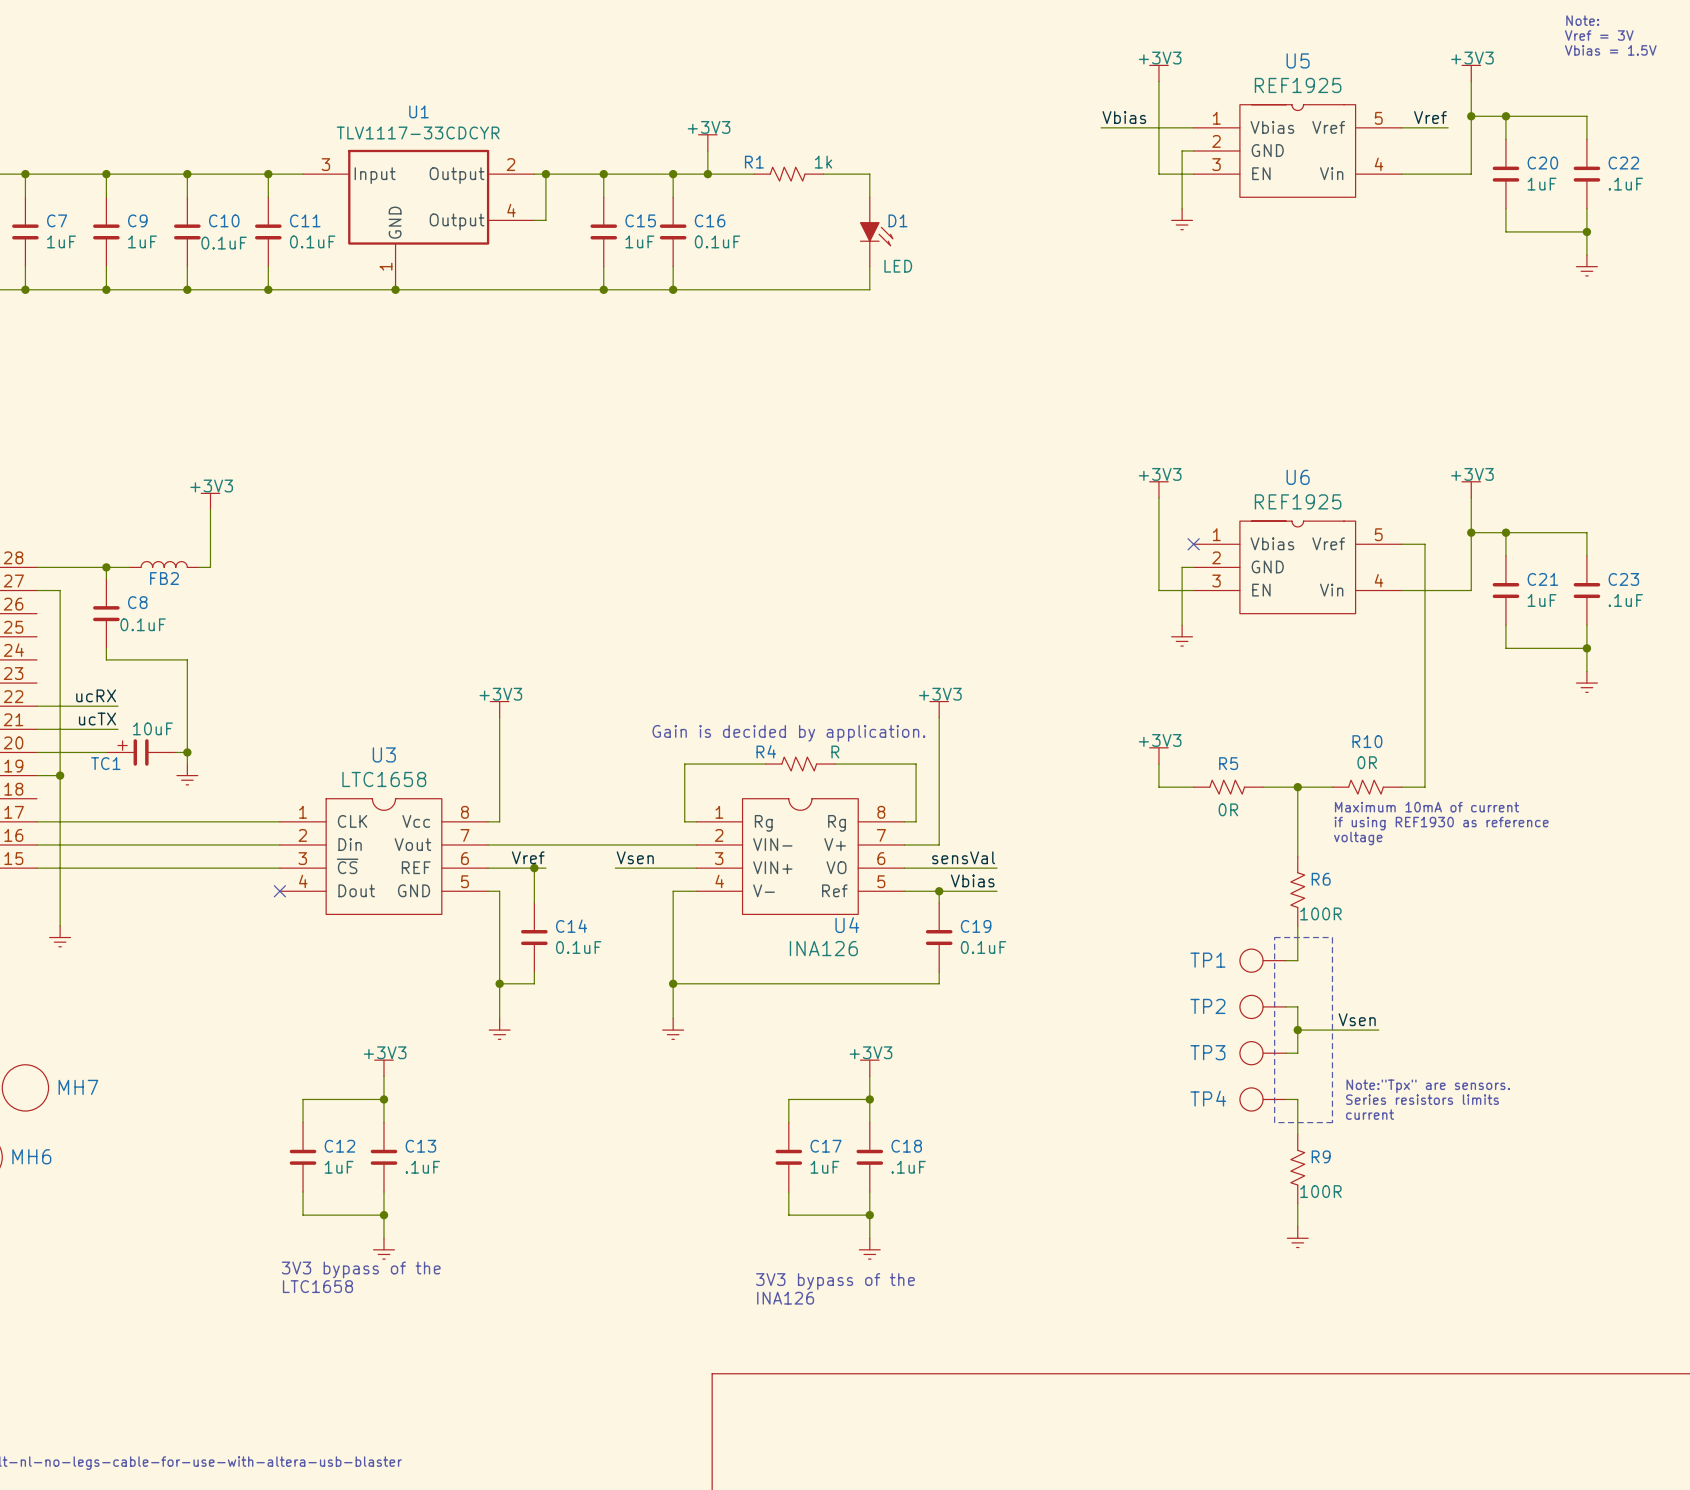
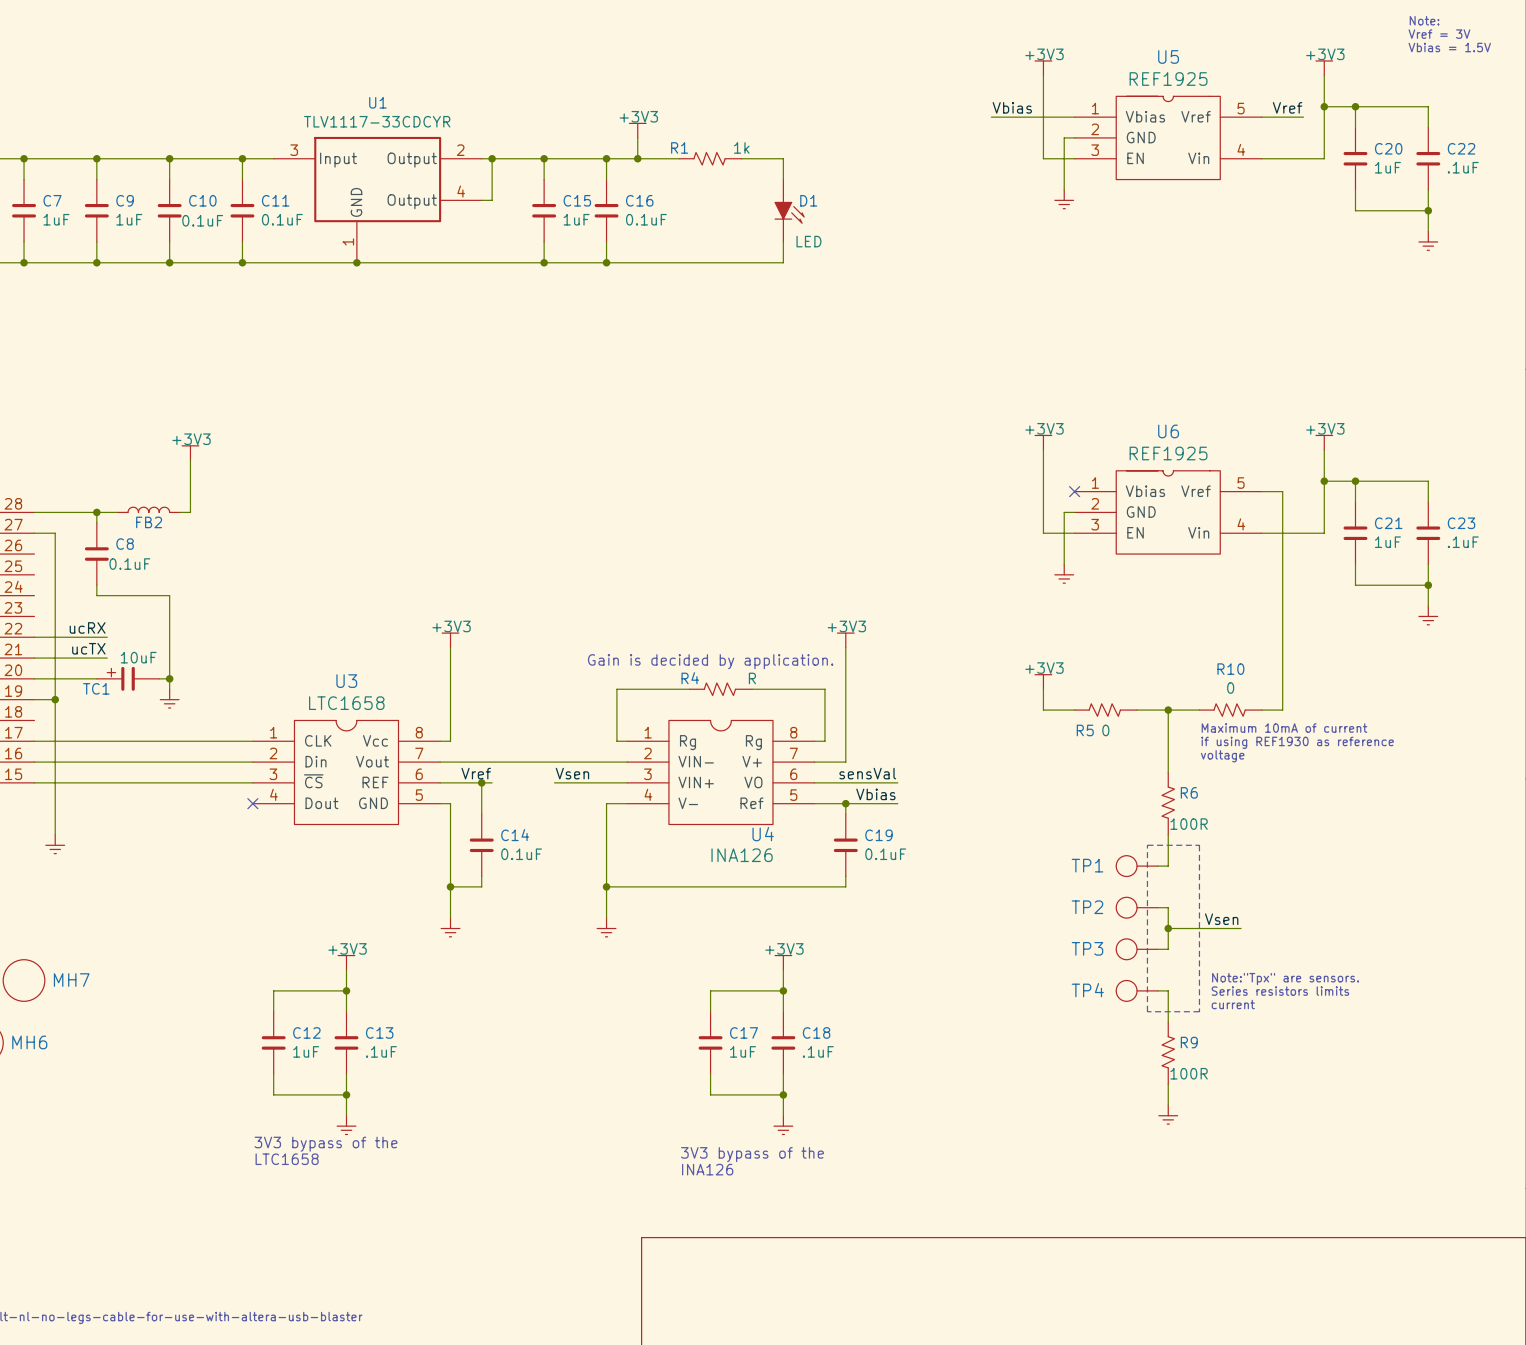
R10 value: 0R (1367, 762) -> 0 (1230, 688)
R5 name position: R5 (1228, 763) -> R5 (1085, 730)
R5 value: 0R (1228, 809) -> 0 (1105, 730)

